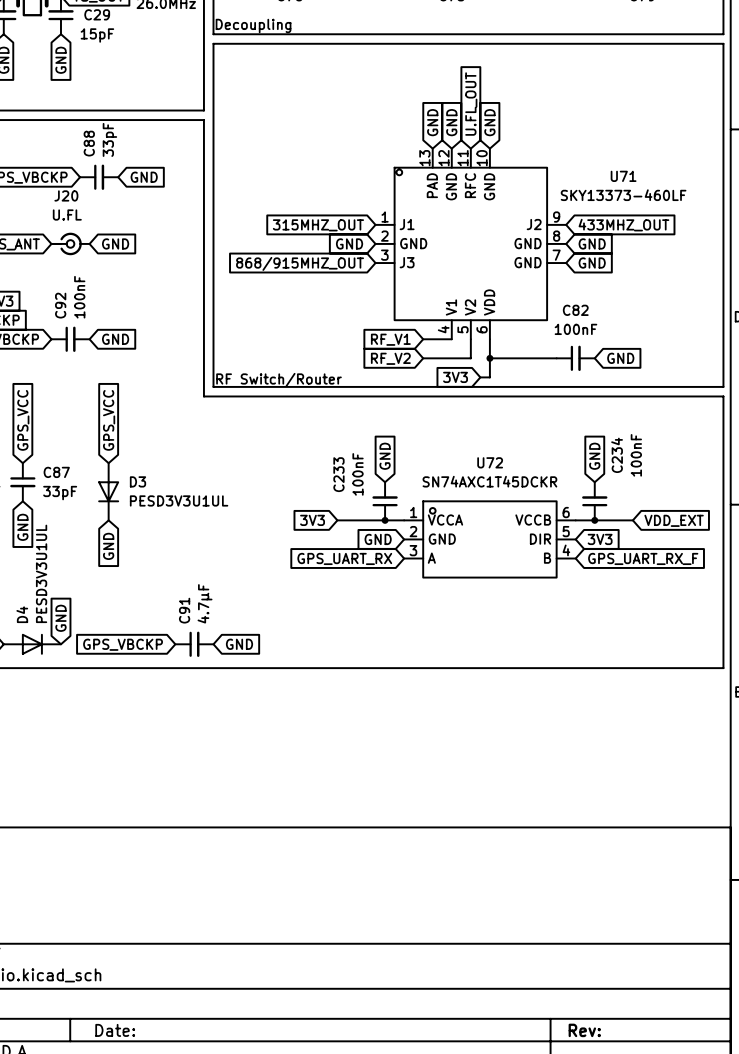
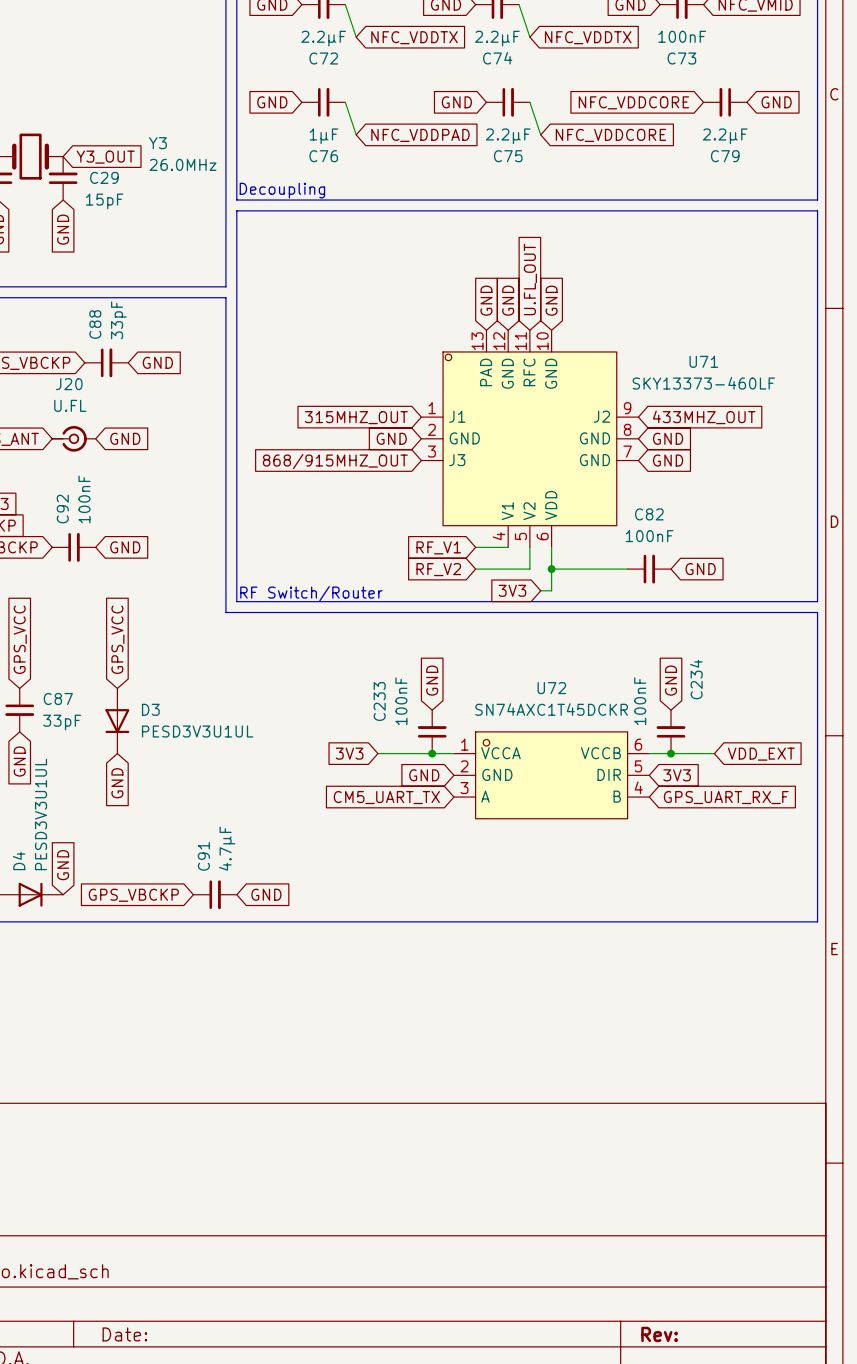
C234 value position: 100nF (636, 455) -> 100nF (640, 701)
global label: GPS_UART_RX (344, 558) -> CM5_UART_TX (386, 797)

